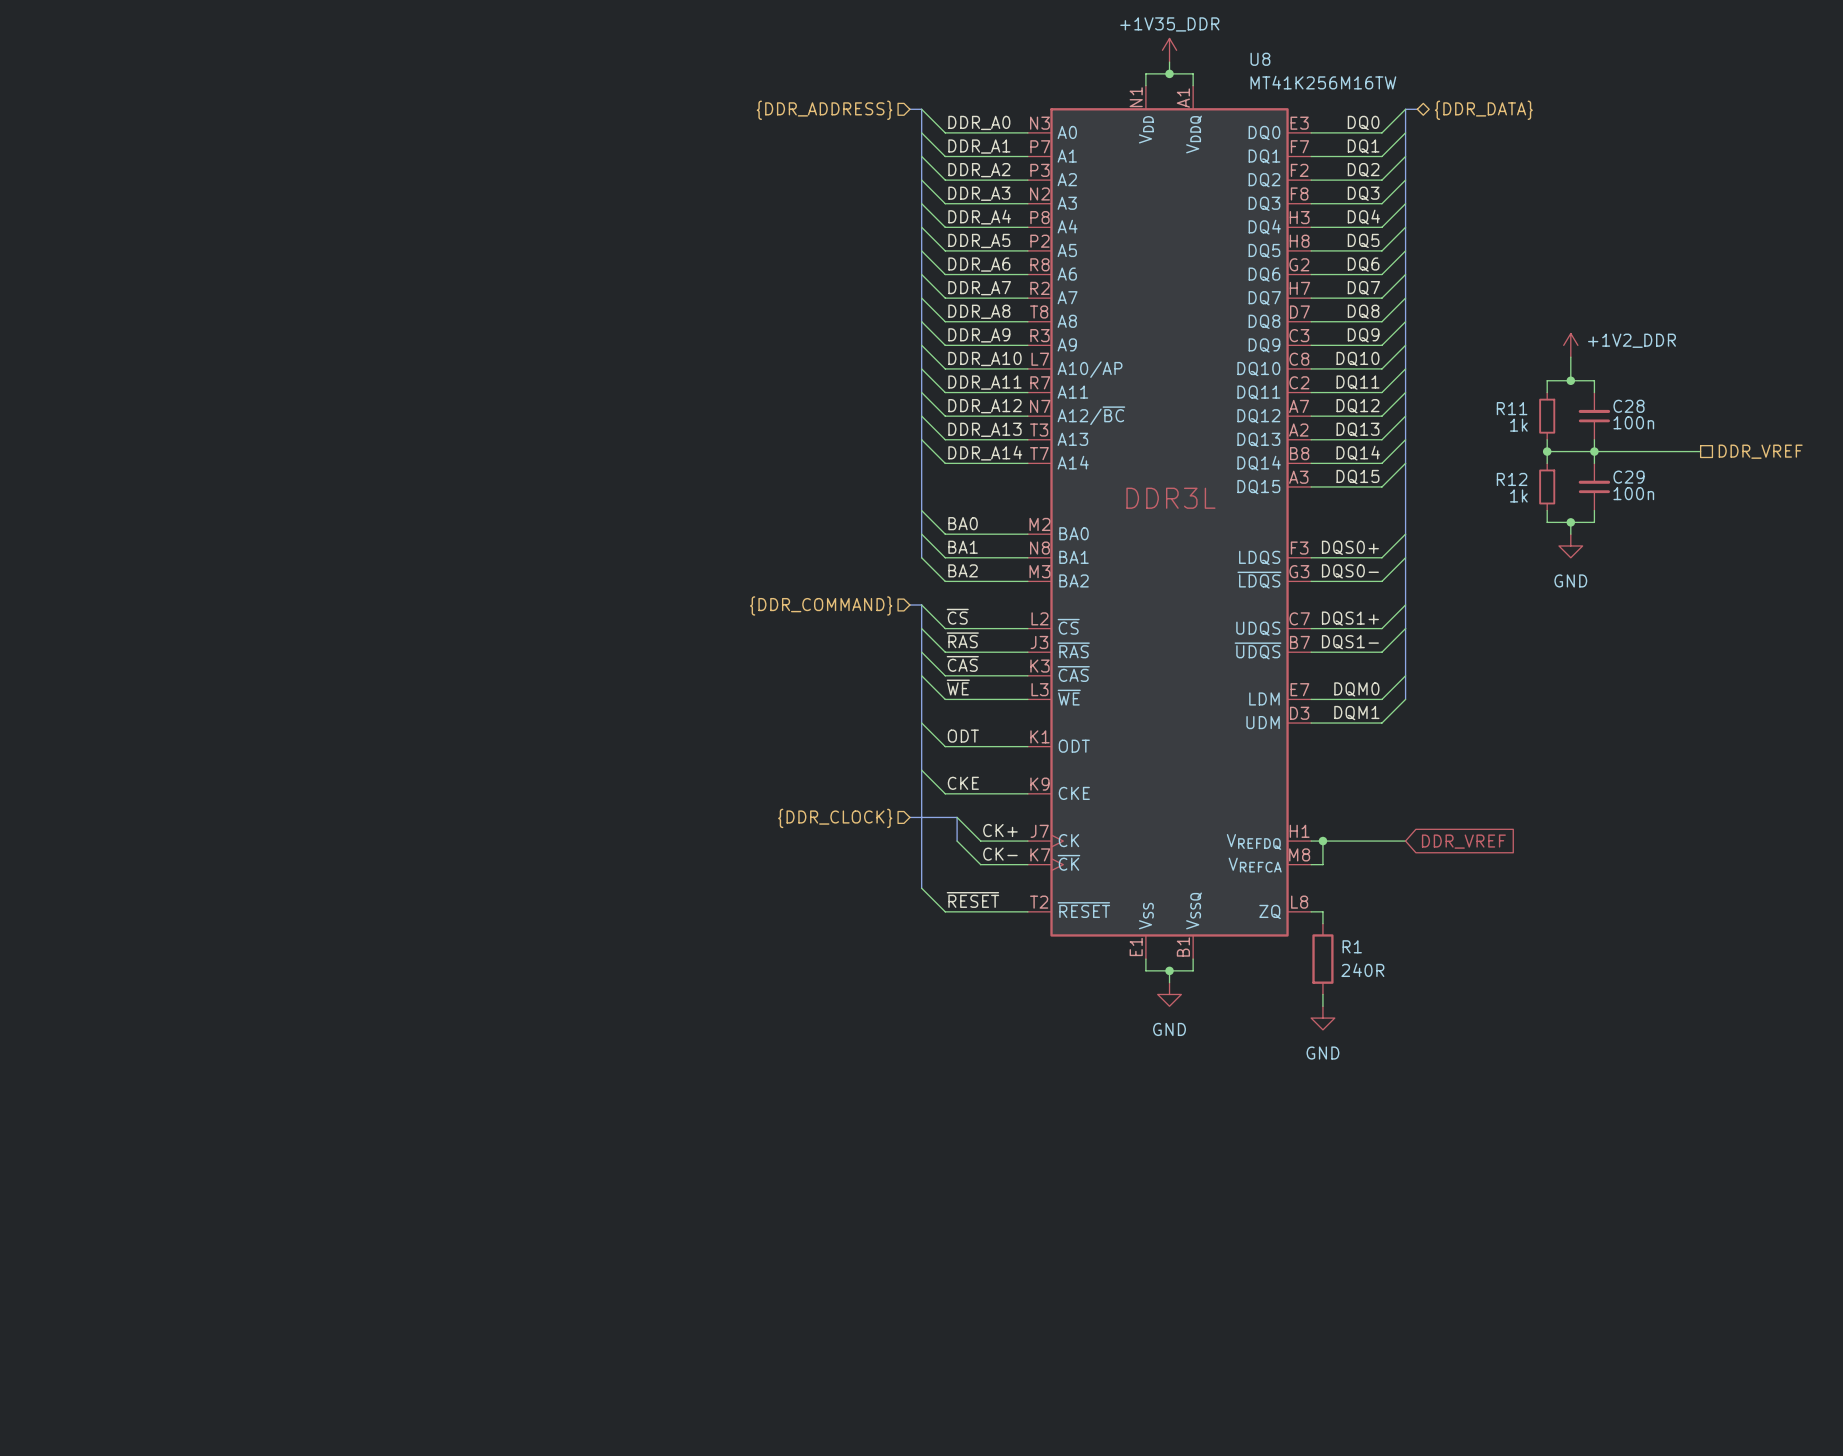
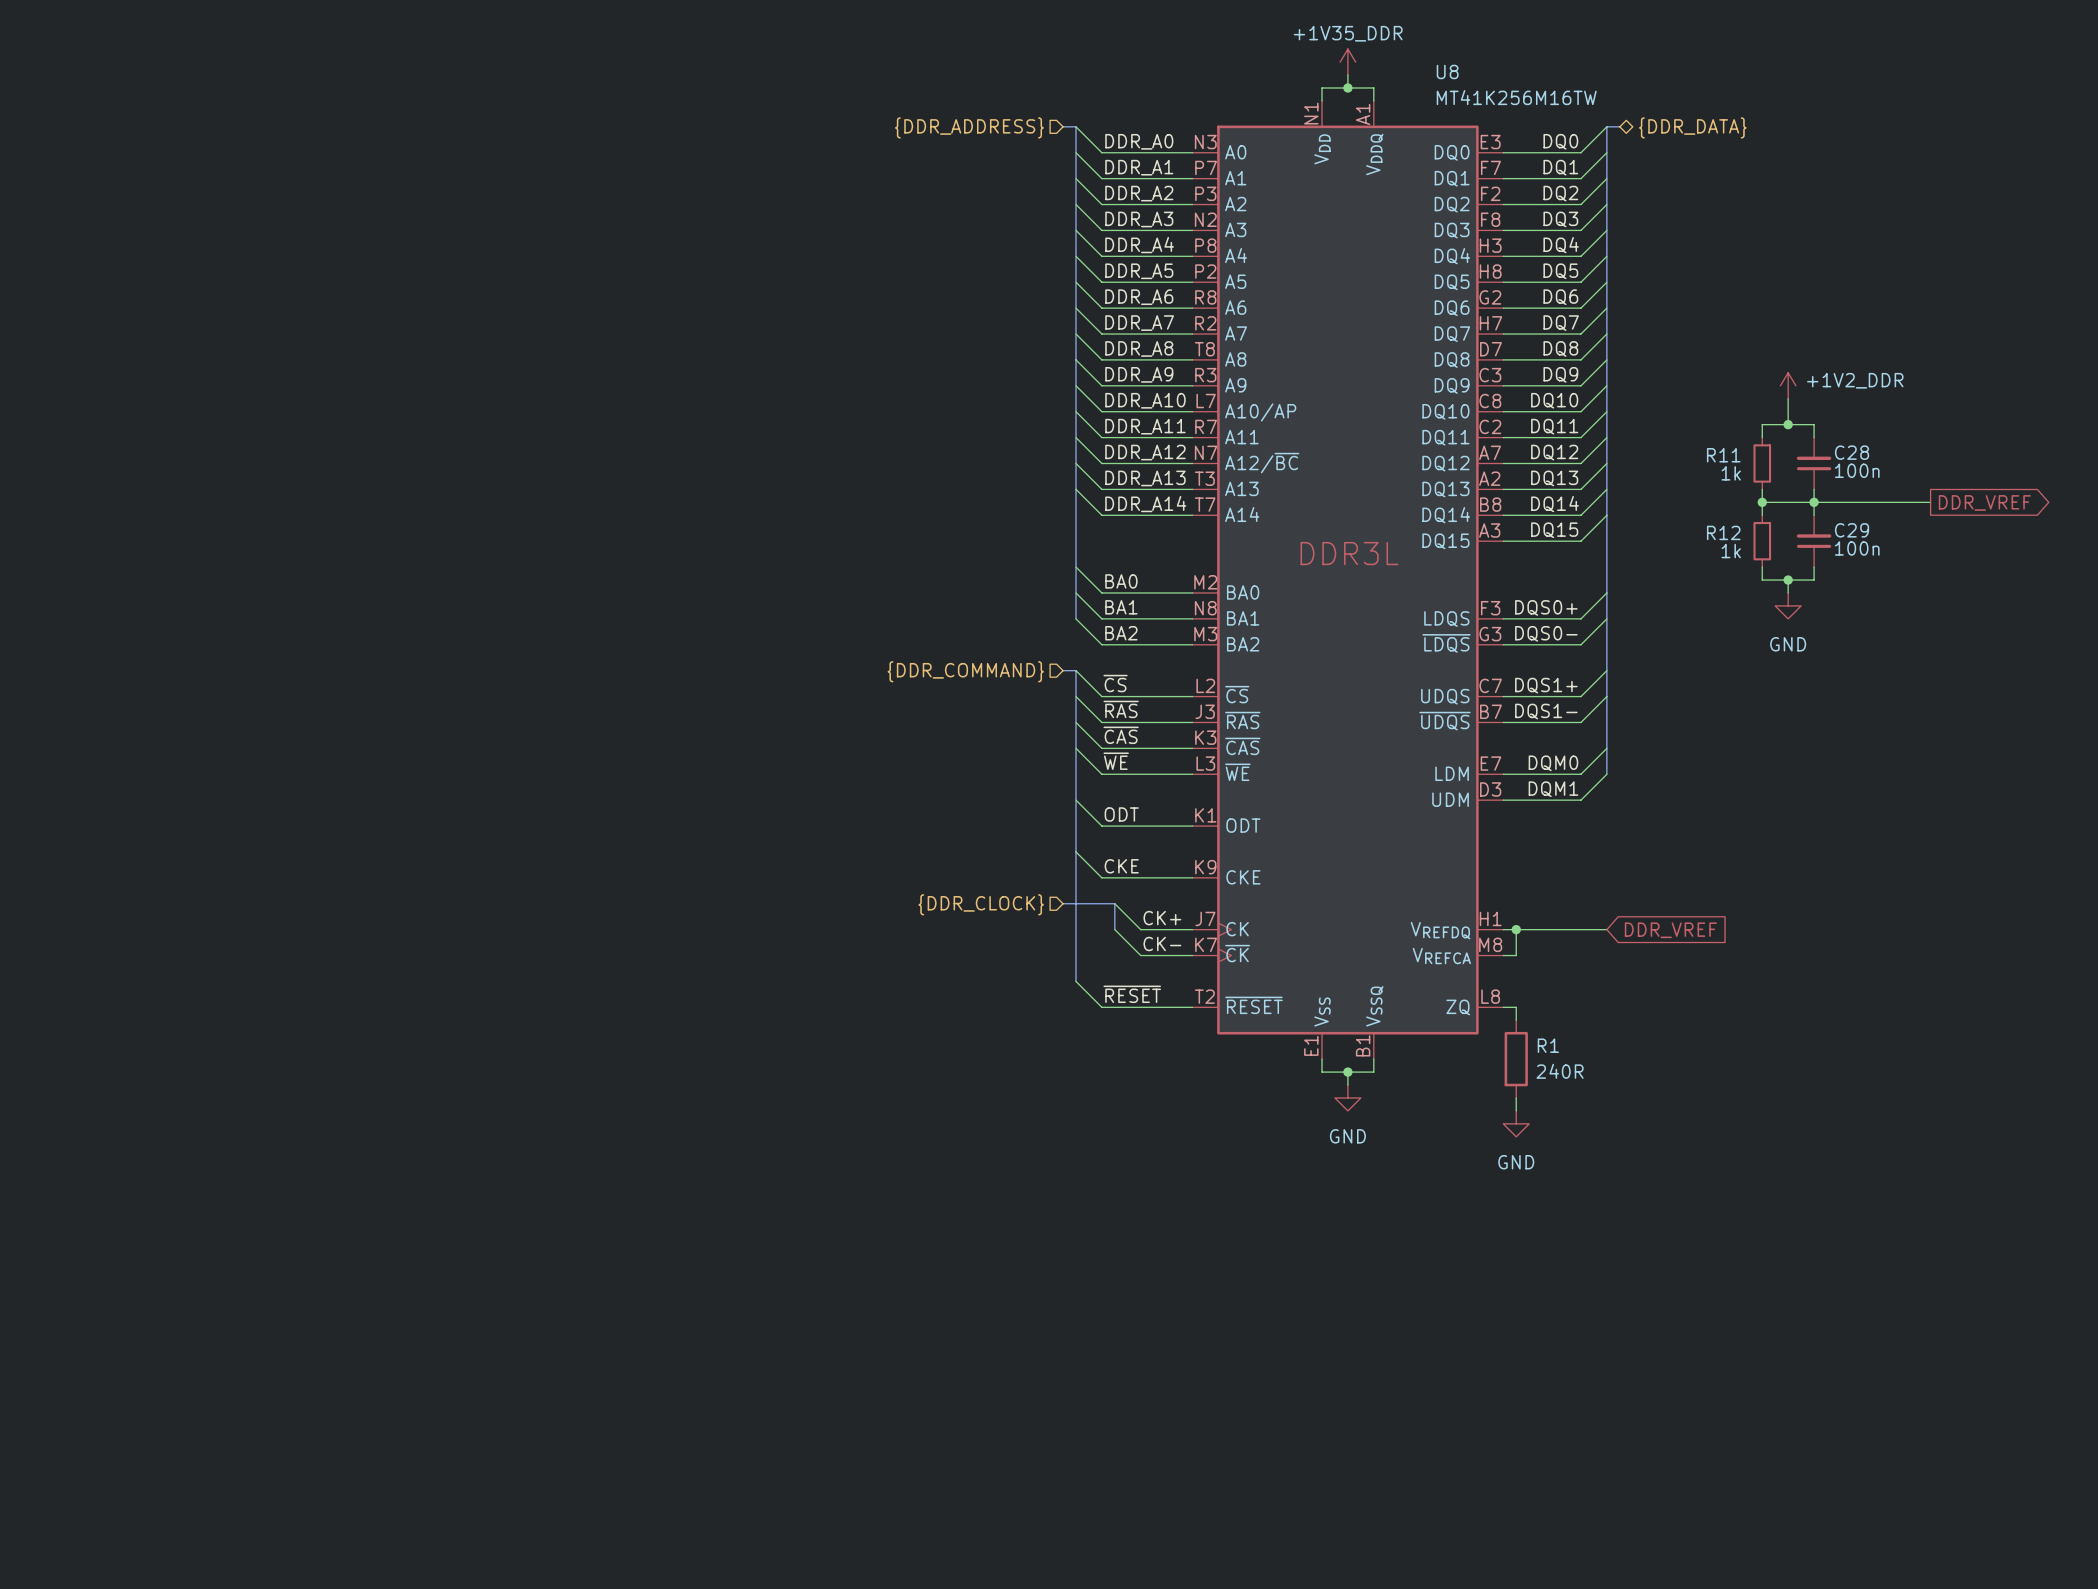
hierarchical label: DDR_VREF (1760, 451) -> none
global label: none -> DDR_VREF (1984, 502)

